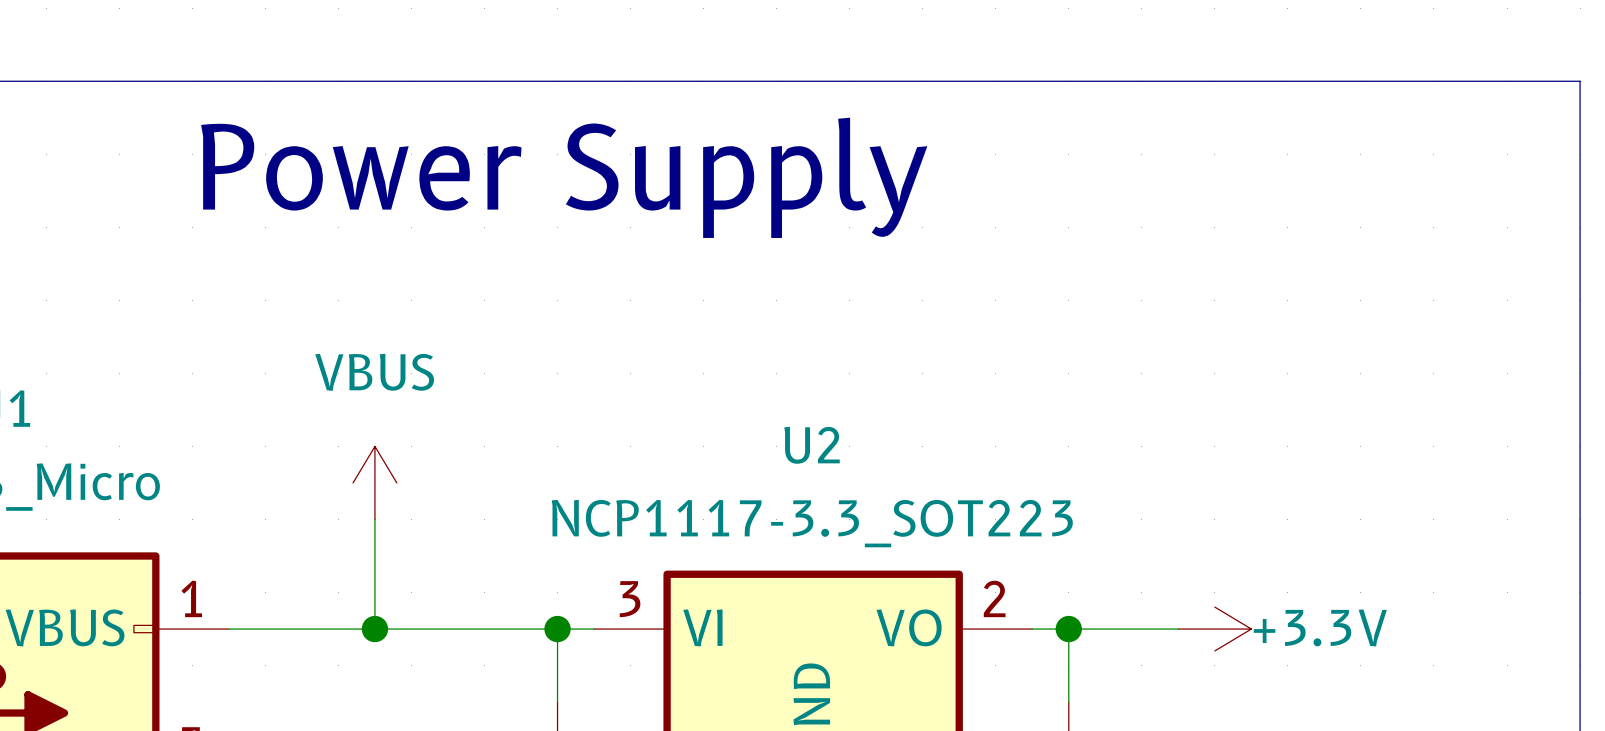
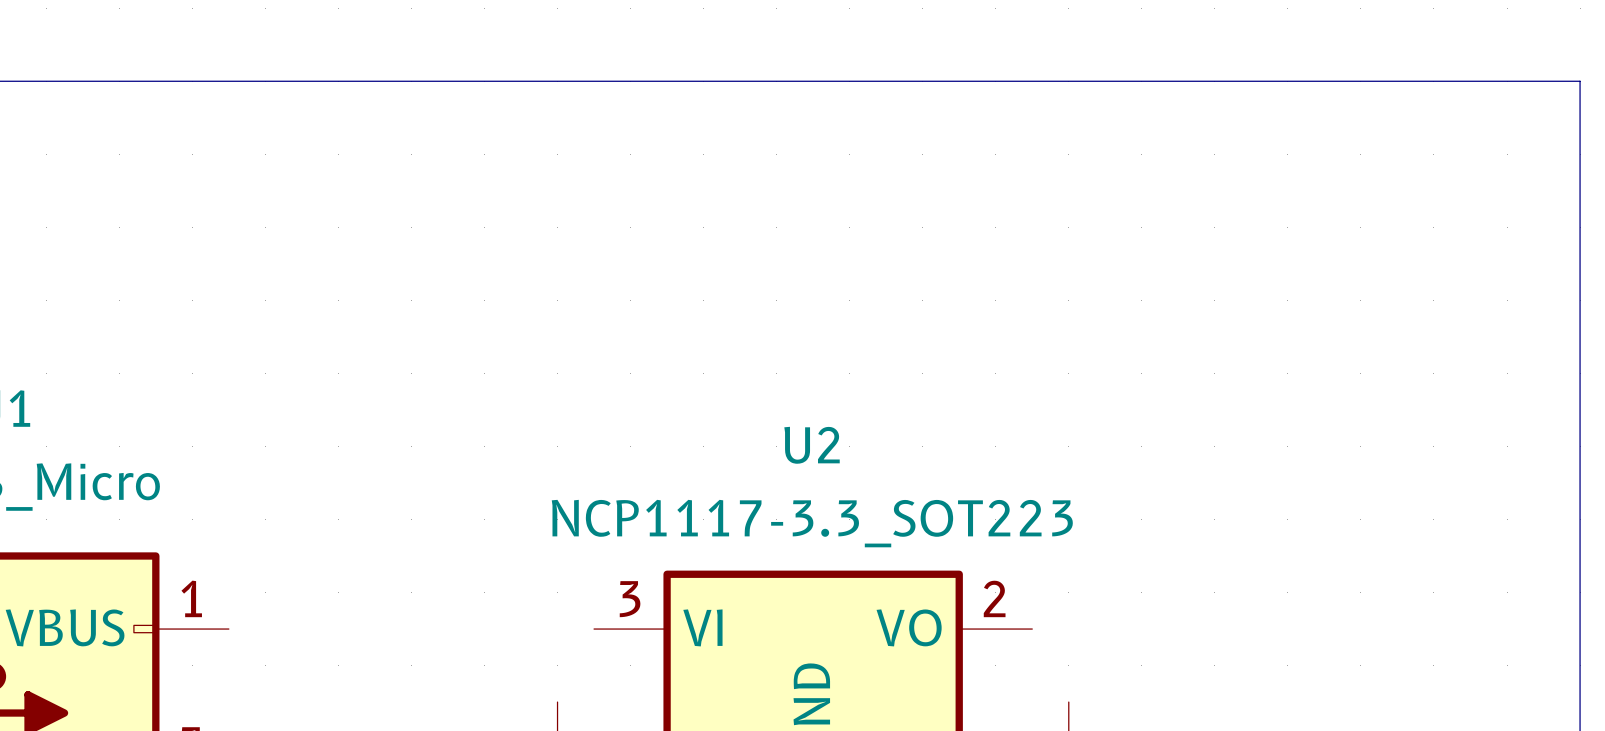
text: Power Supply (564, 177) -> none
power symbol: VBUS (374, 482) -> none
wire: (374, 519) (374, 629) -> none
wire: (228, 629) (594, 629) -> none
junction: (374, 629) -> none
wire: (557, 629) (557, 702) -> none
junction: (557, 629) -> none
wire: (1032, 629) (1178, 629) -> none
wire: (1068, 629) (1068, 702) -> none
junction: (1068, 629) -> none
power symbol: +3.3V (1214, 629) -> none

